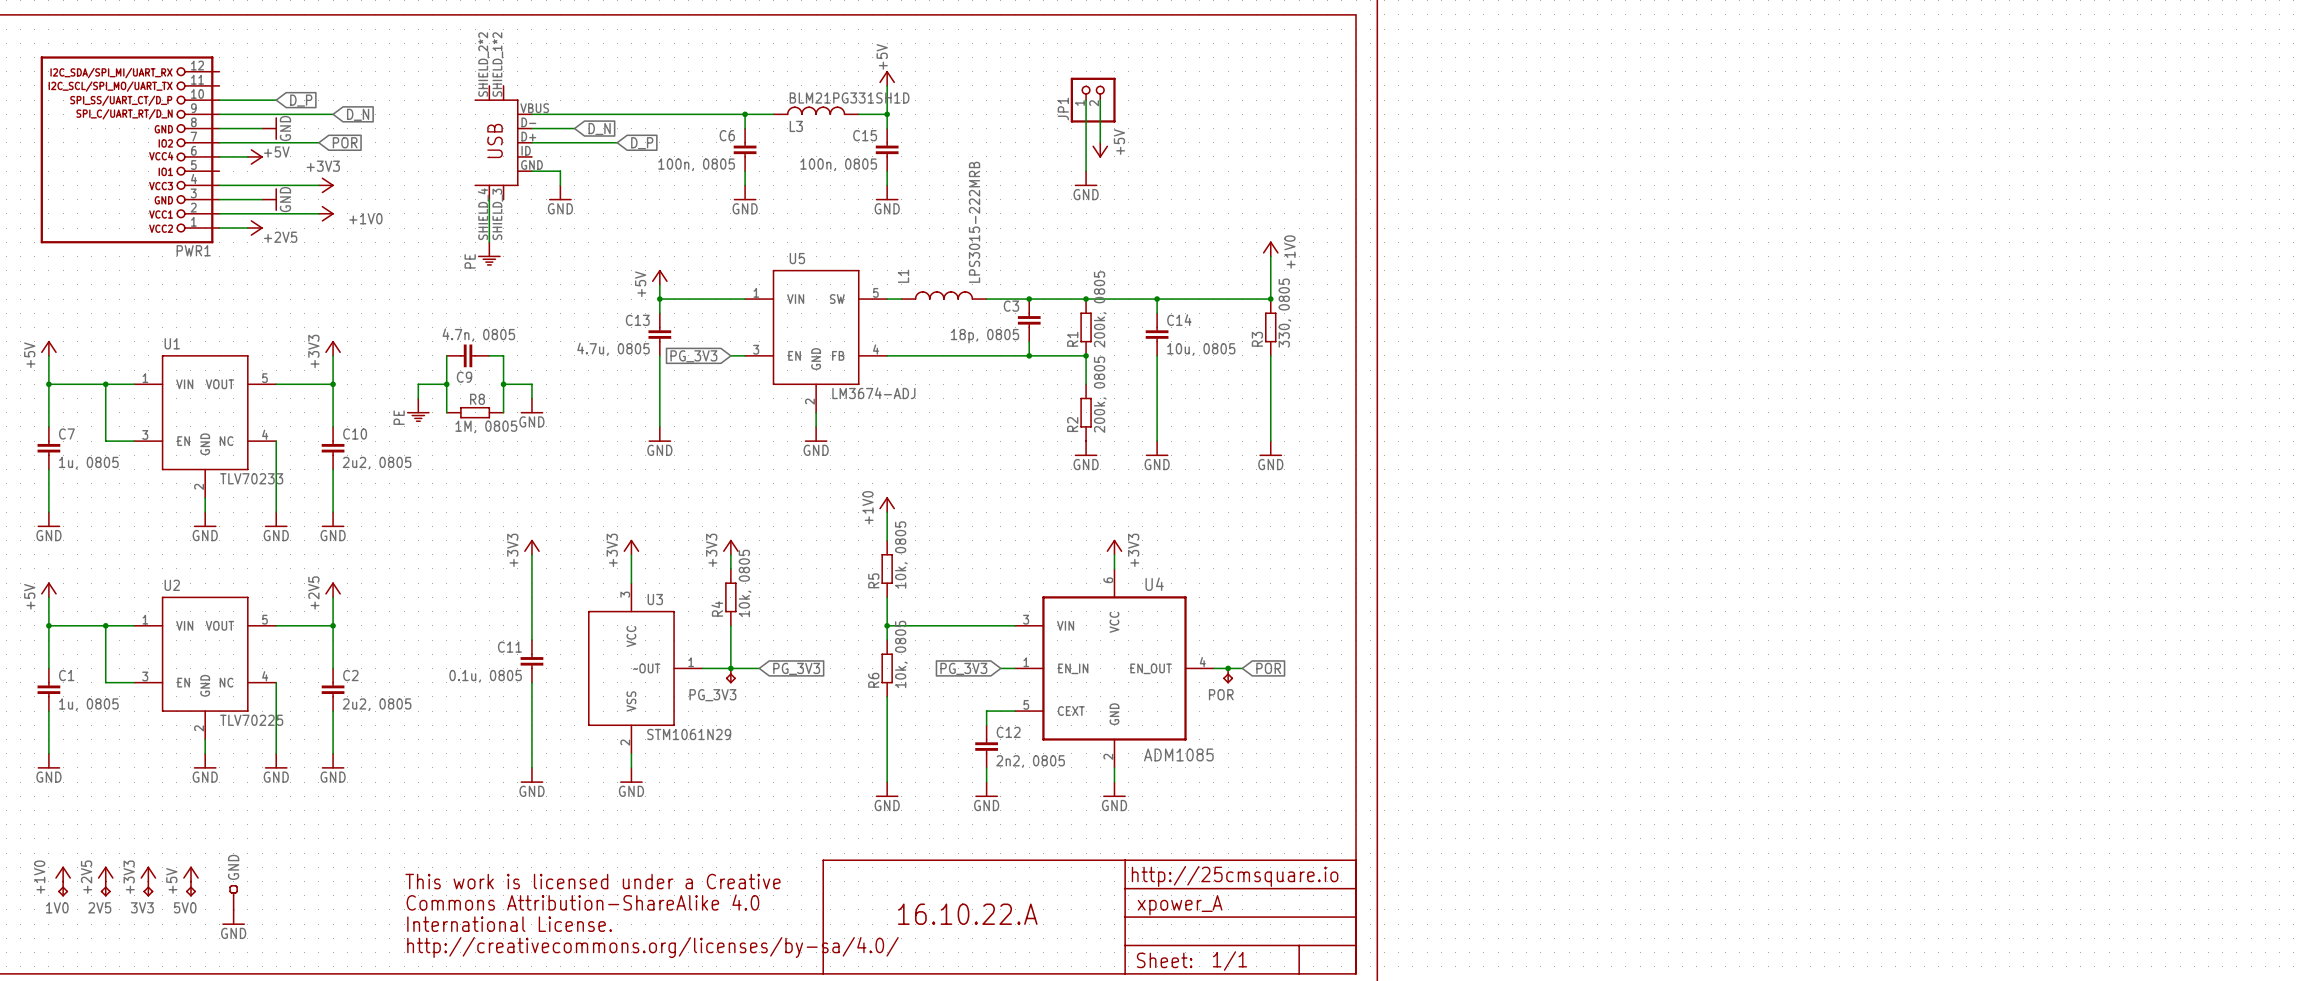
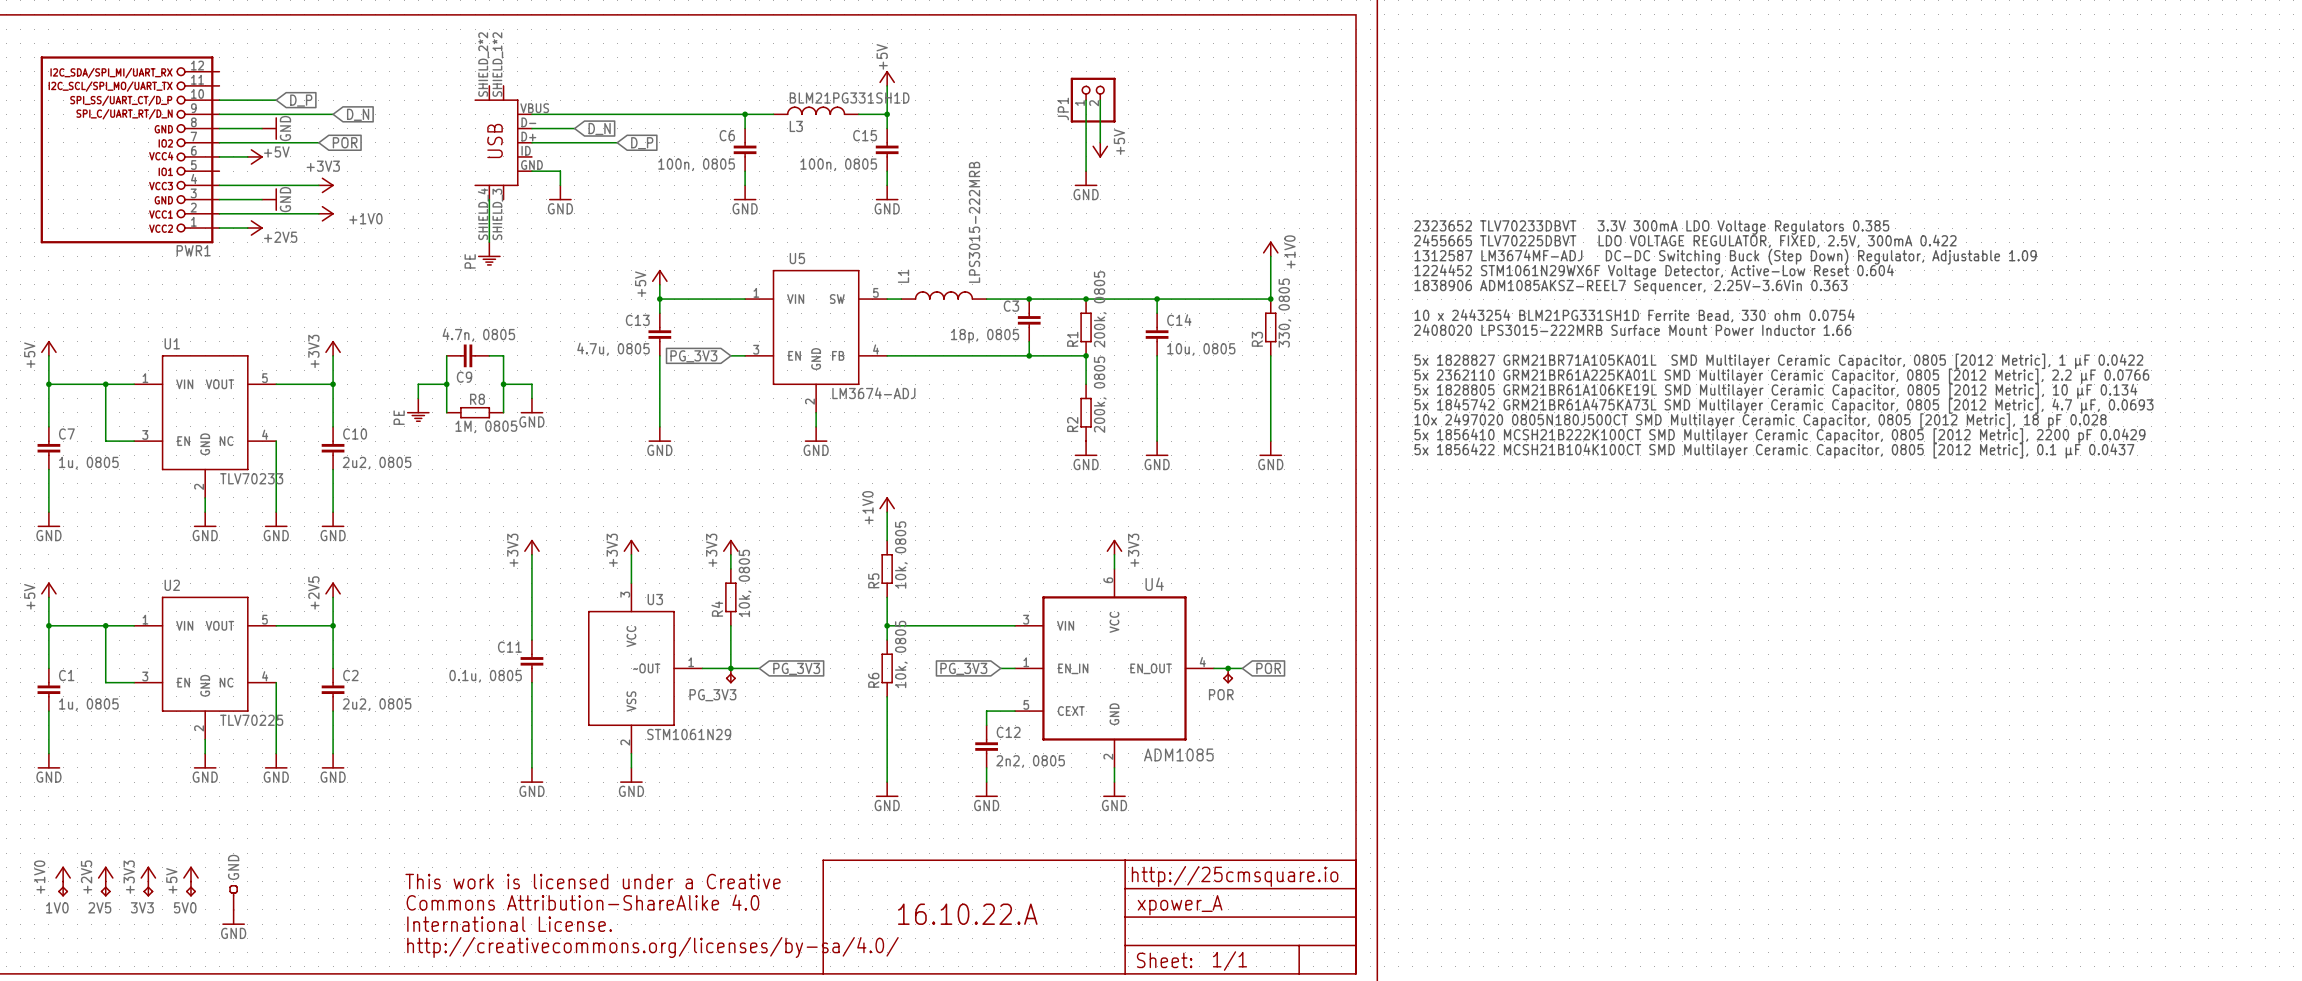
text: none -> 2323652 TLV70233DBVT 3.3V 300mA LDO Voltage Regulators 0.385 (1651, 227)
text: none -> 2455665 TLV70225DBVT LDO VOLTAGE REGULATOR, FIXED, 2.5V, 300mA 0.422 (1685, 241)
text: none -> 1312587 LM3674MF-ADJ DC-DC Switching Buck (Step Down) Regulator, Adjustable 1.09 (1725, 256)
text: none -> 1224452 STM1061N29WX6F Voltage Detector, Active-Low Reset 0.604 (1654, 272)
text: none -> 1838906 ADM1085AKSZ-REEL7 Sequencer, 2.25V-3.6Vin 0.363 (1630, 287)
text: none -> 10 x 2443254 BLM21PG331SH1D Ferrite Bead, 330 ohm 0.0754 (1634, 315)
text: none -> 2408020 LPS3015-222MRB Surface Mount Power Inductor 1.66 (1632, 330)
text: none -> 5x 1828827 GRM21BR71A105KA01L SMD Multilayer Ceramic Capacitor, 0805 [2012 Metric], 1 µF 0.0422 (1778, 361)
text: none -> 5x 2362110 GRM21BR61A225KA01L SMD Multilayer Ceramic Capacitor, 0805 [2012 Metric], 2.2 µF 0.0766 (1781, 376)
text: none -> 5x 1828805 GRM21BR61A106KE19L SMD Multilayer Ceramic Capacitor, 0805 [2012 Metric], 10 µF 0.134 (1775, 391)
text: none -> 5x 1845742 GRM21BR61A475KA73L SMD Multilayer Ceramic Capacitor, 0805 [2012 Metric], 4.7 µF, 0.0693 (1783, 406)
text: none -> 10x 2497020 0805N180J500CT SMD Multilayer Ceramic Capacitor, 0805 [2012 Metric], 18 pF 0.028 (1760, 420)
text: none -> 5x 1856410 MCSH21B222K100CT SMD Multilayer Ceramic Capacitor, 0805 [2012 Metric], 2200 pF 0.0429 (1779, 435)
text: none -> 5x 1856422 MCSH21B104K100CT SMD Multilayer Ceramic Capacitor, 0805 [2012 Metric], 0.1 µF 0.0437 (1774, 450)

